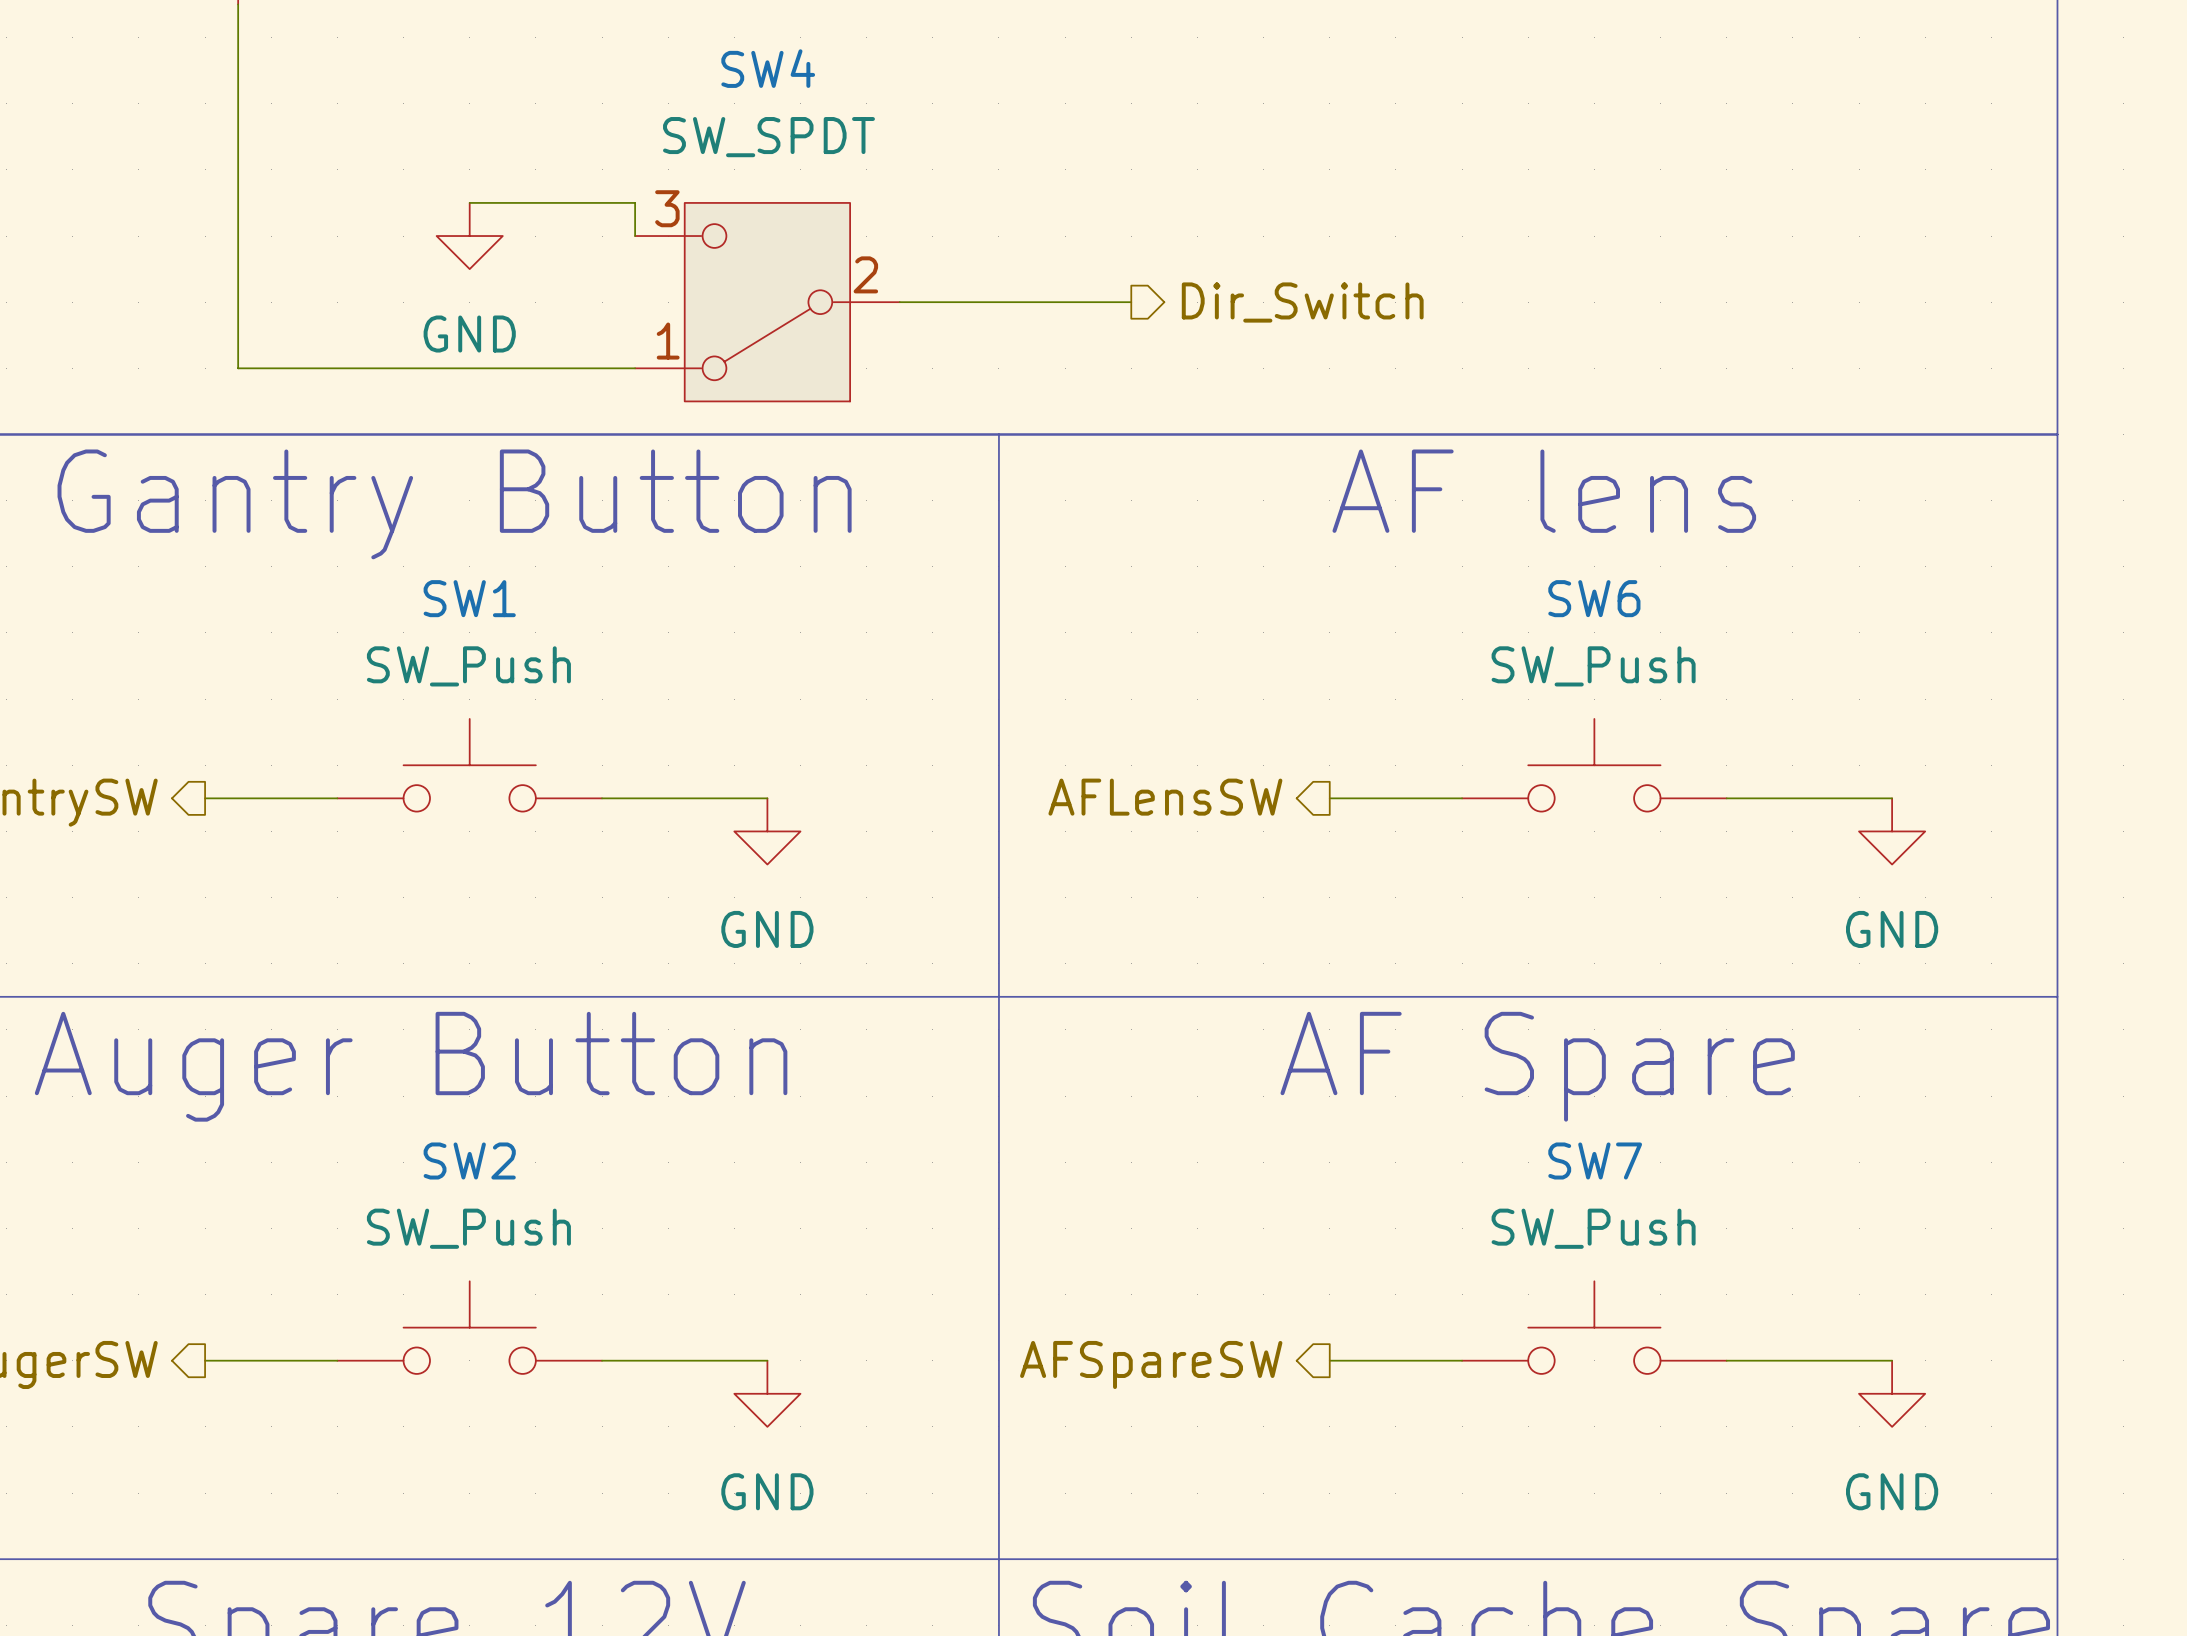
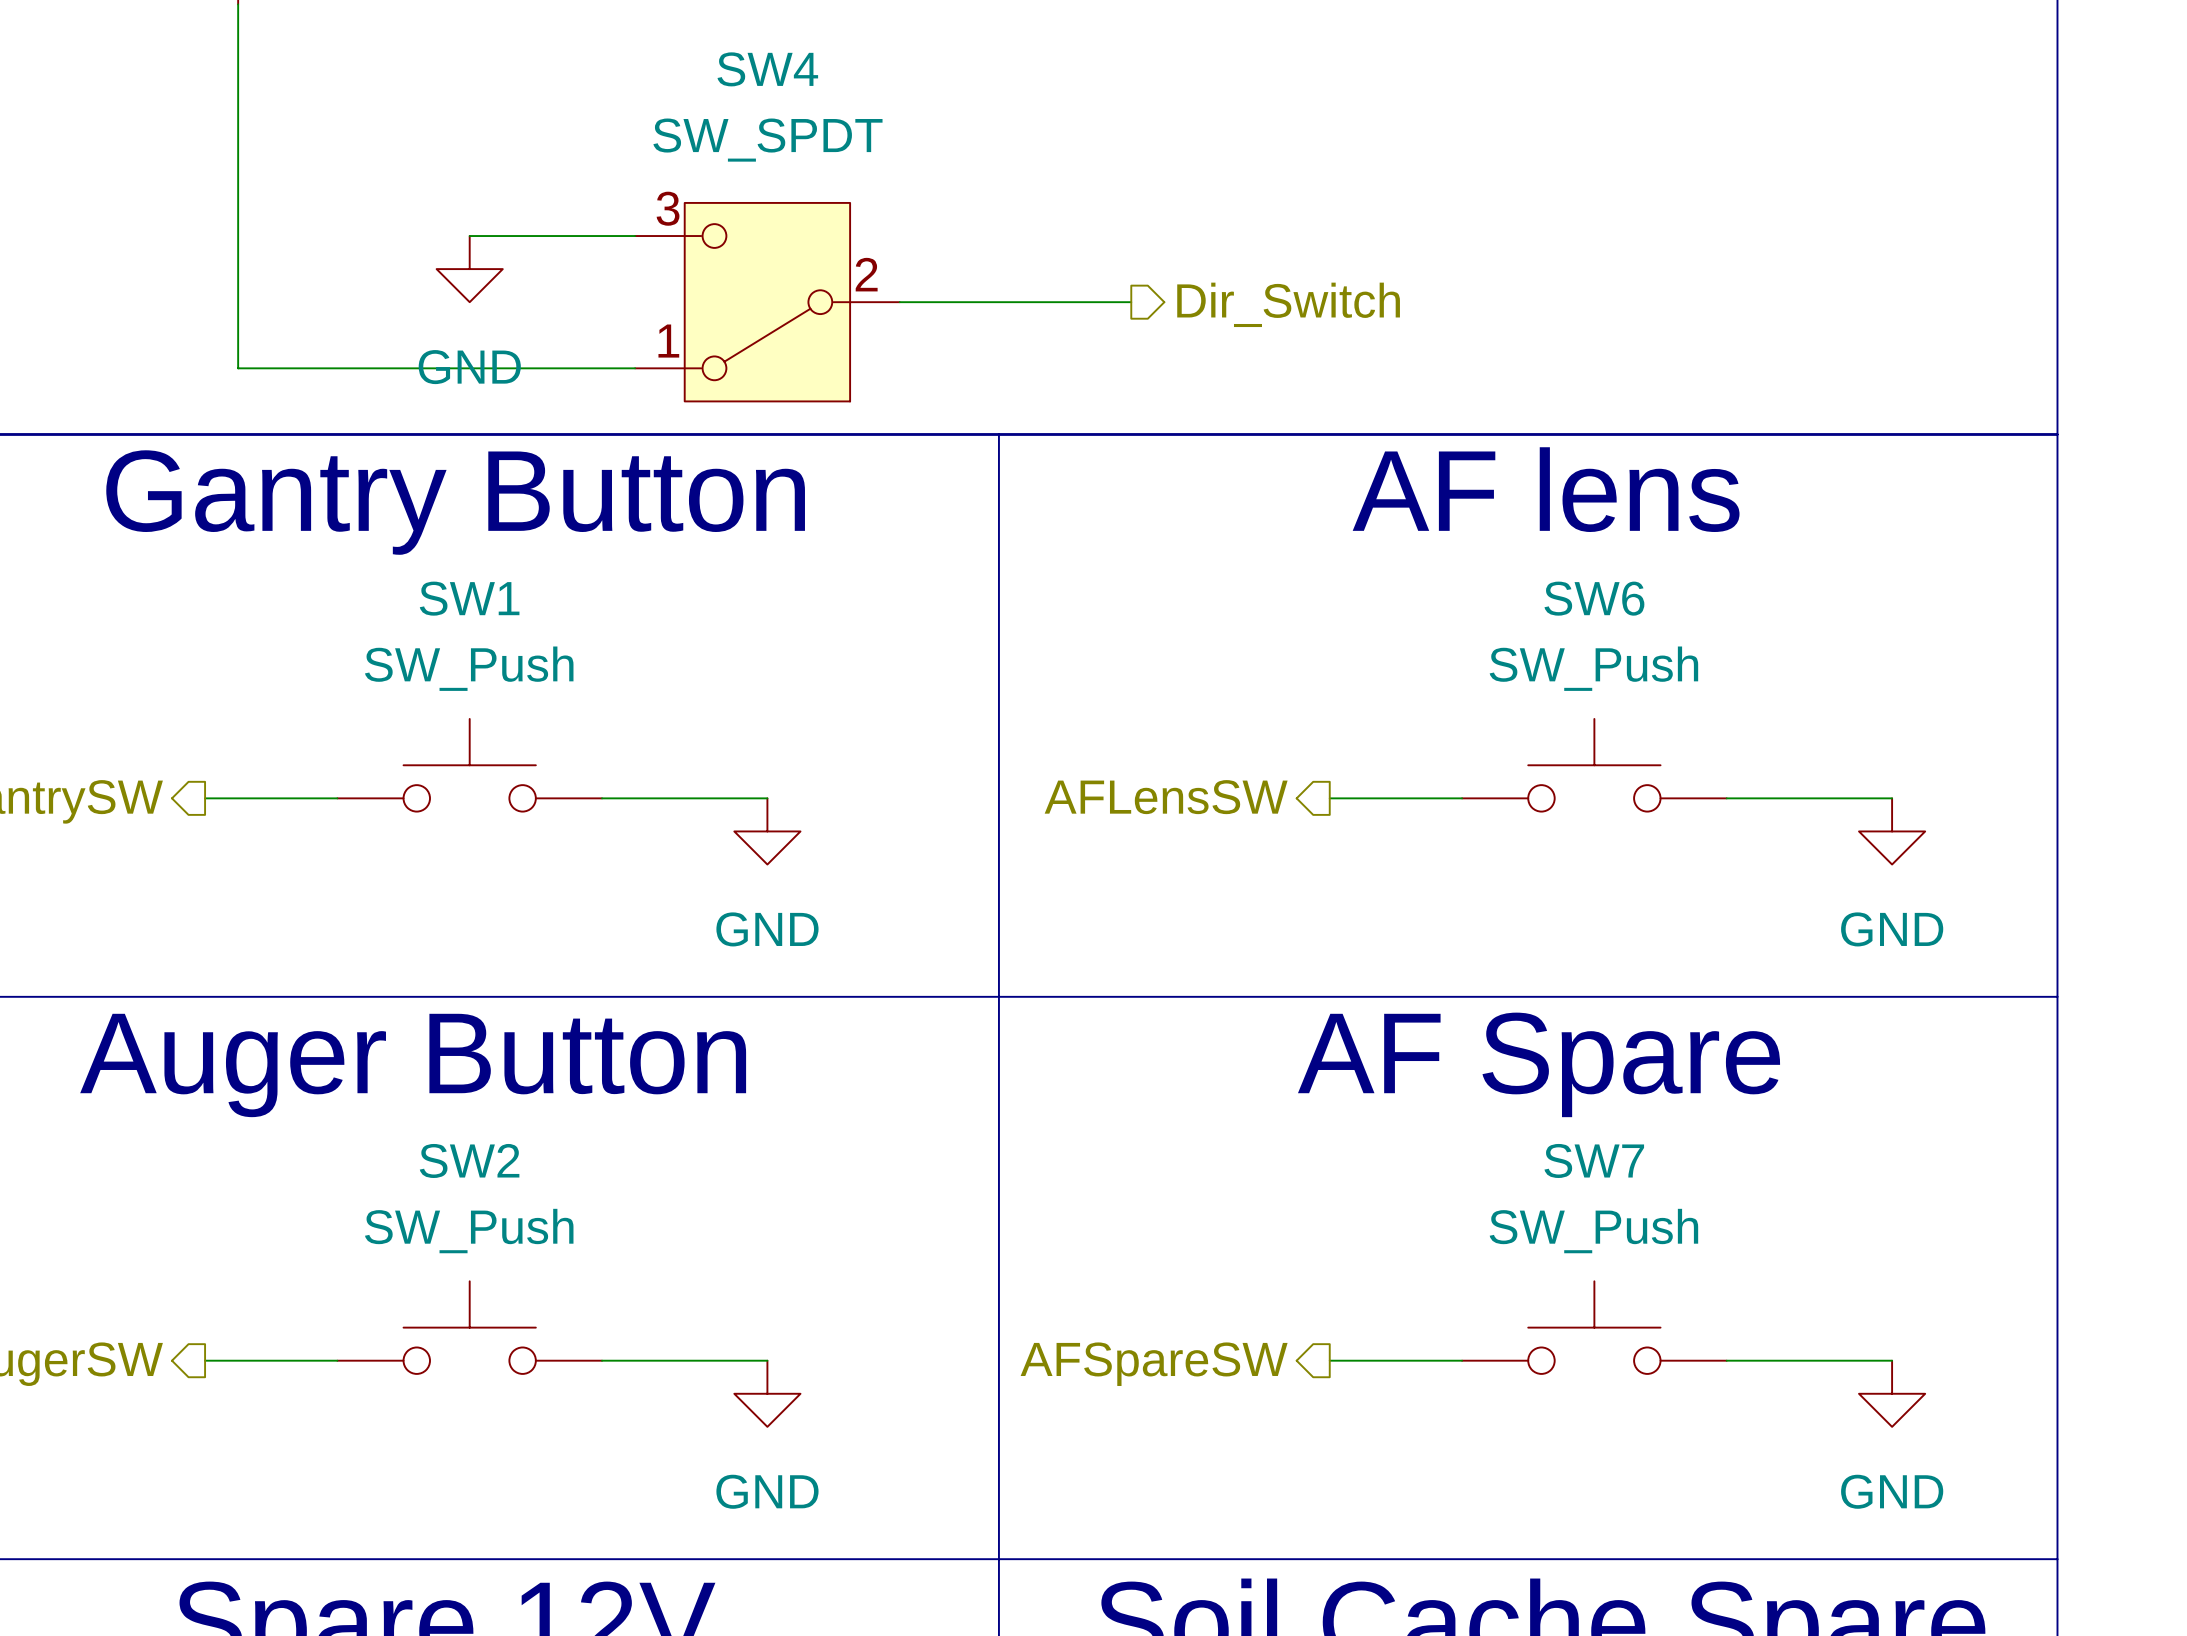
wire: (469, 202) (635, 202) (635, 236) -> (469, 236) (635, 236)
power symbol position: GND (469, 236) -> GND (469, 269)

